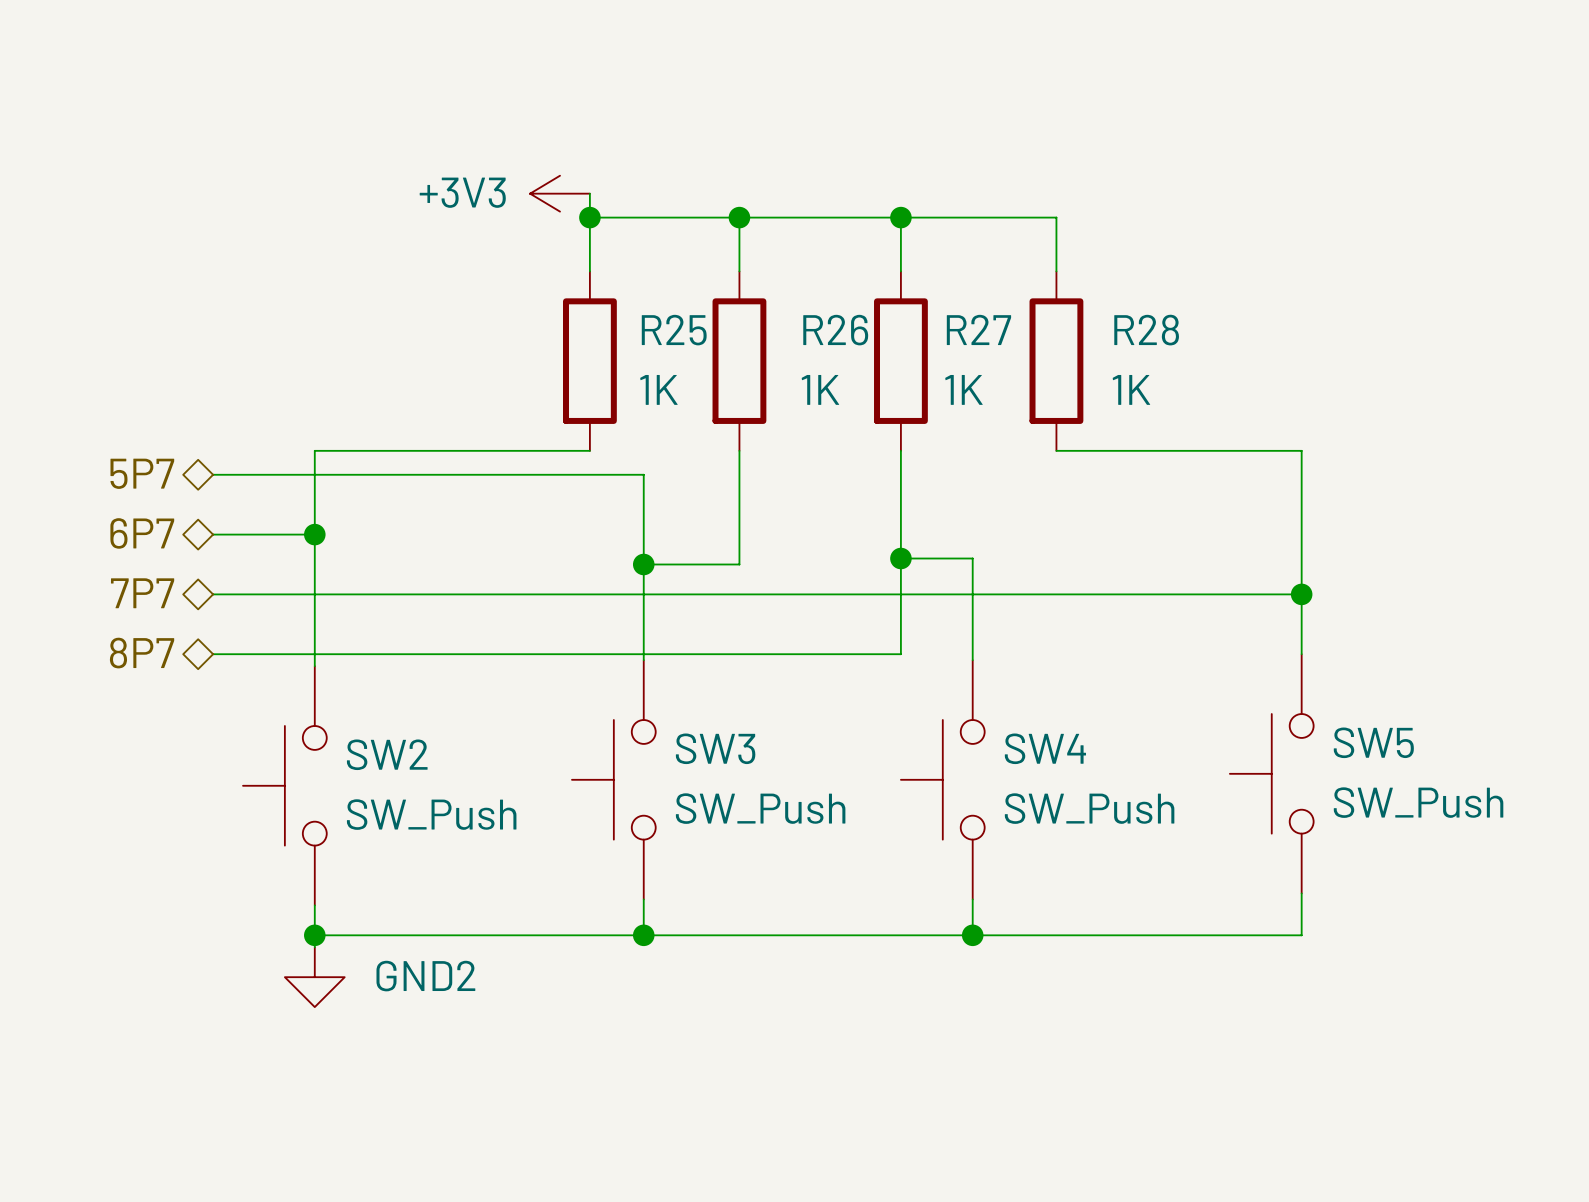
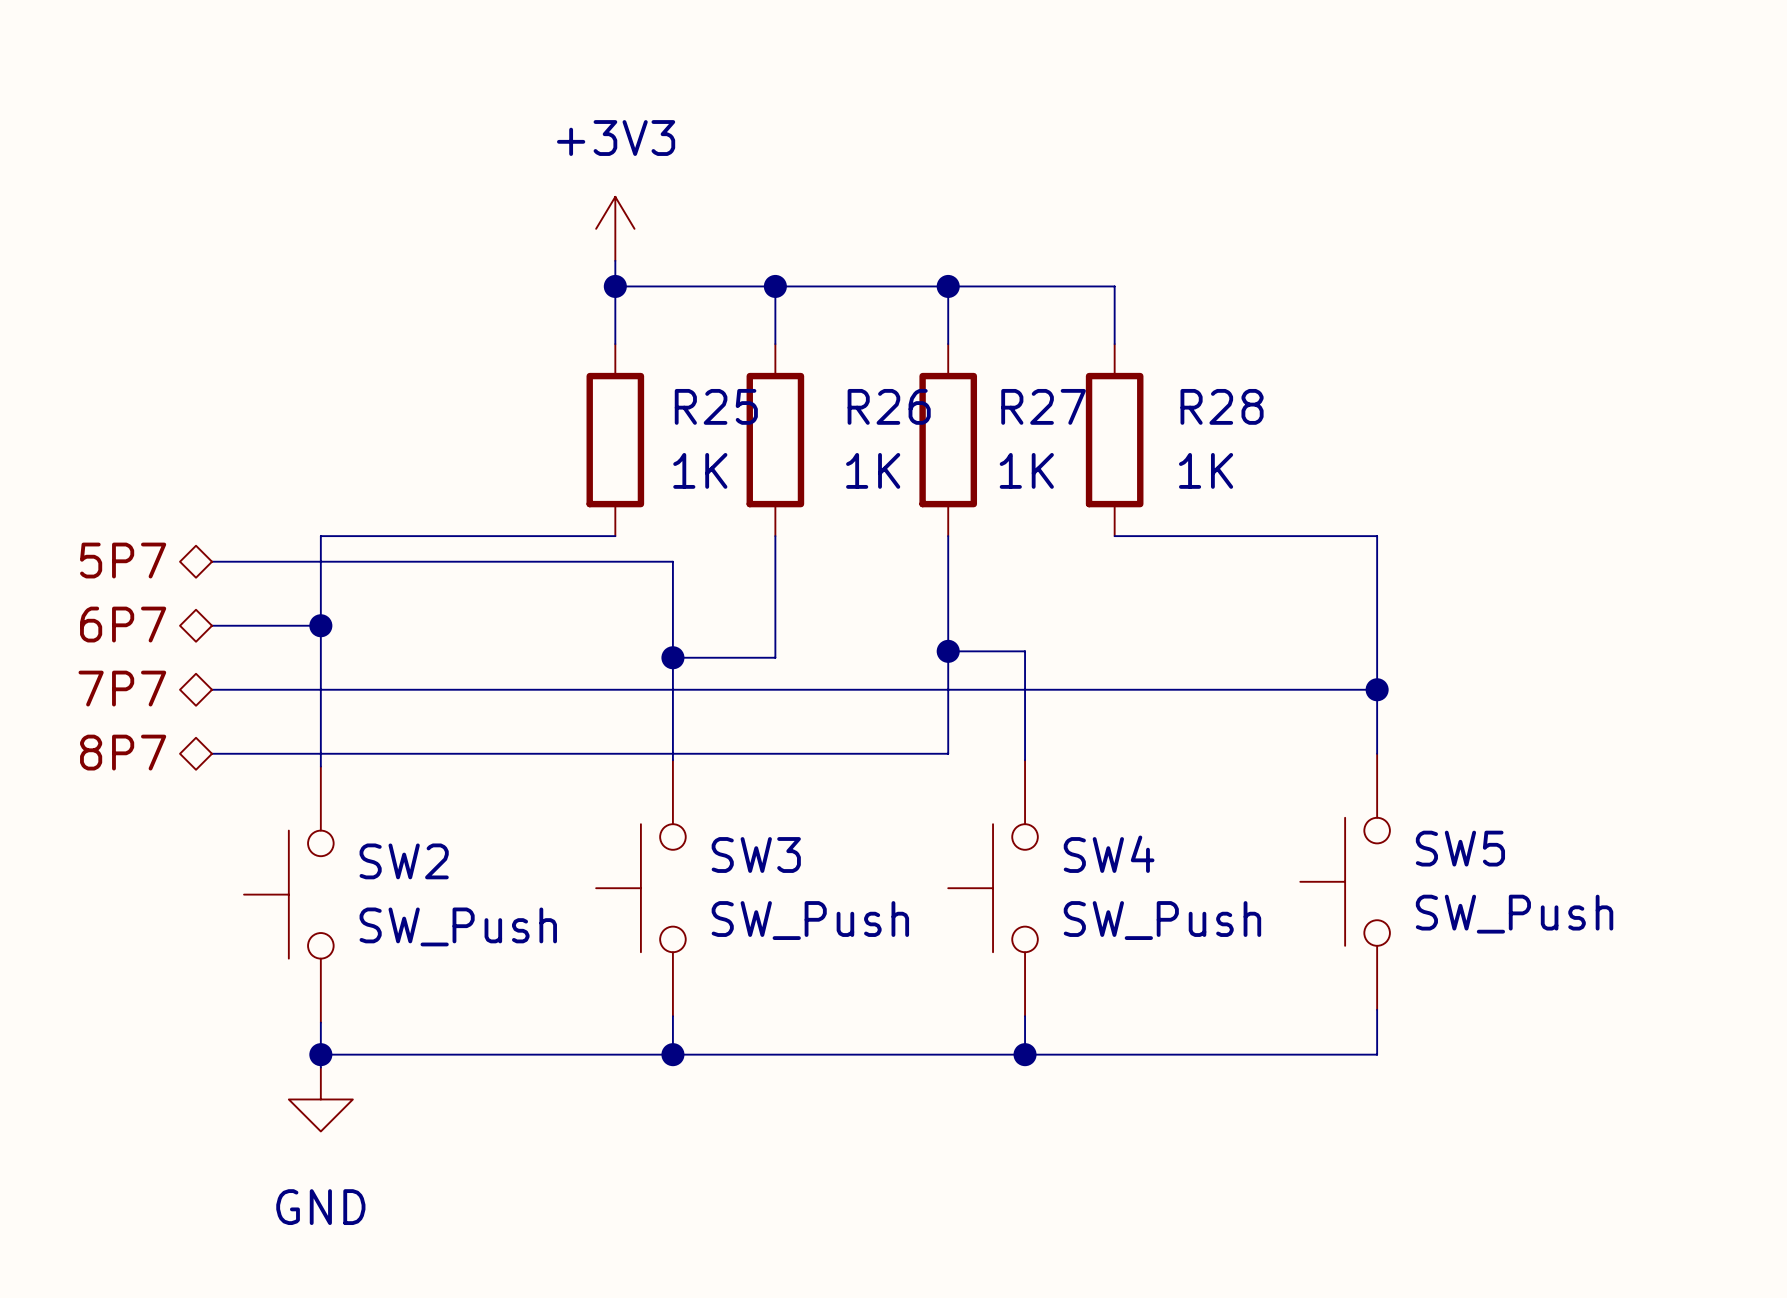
power symbol rotation: 0° (560, 193) -> 90° clockwise (615, 228)
power symbol position: +3V3 (560, 193) -> +3V3 (615, 228)
power symbol: GND2 (314, 977) -> GND (320, 1099)

